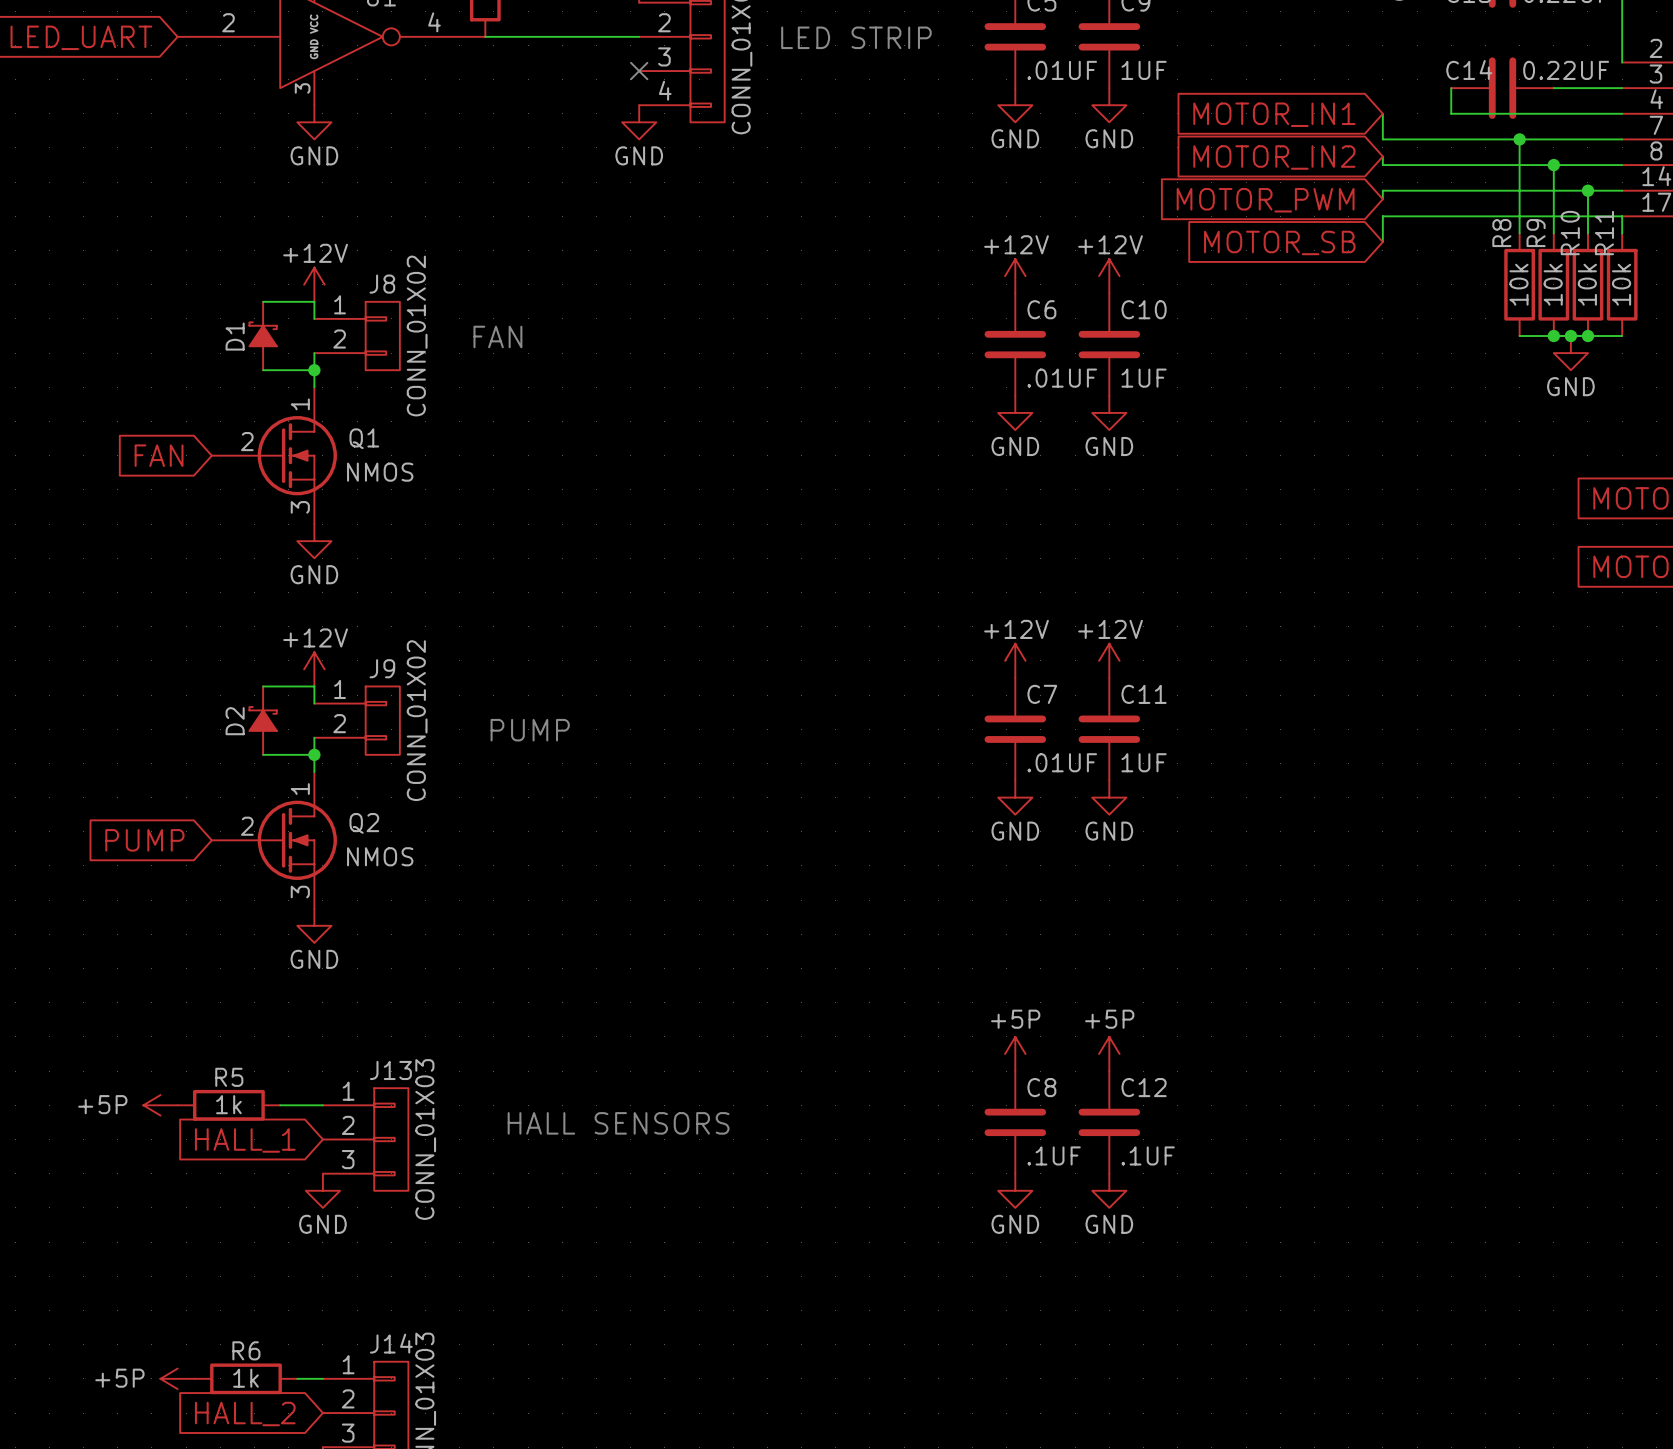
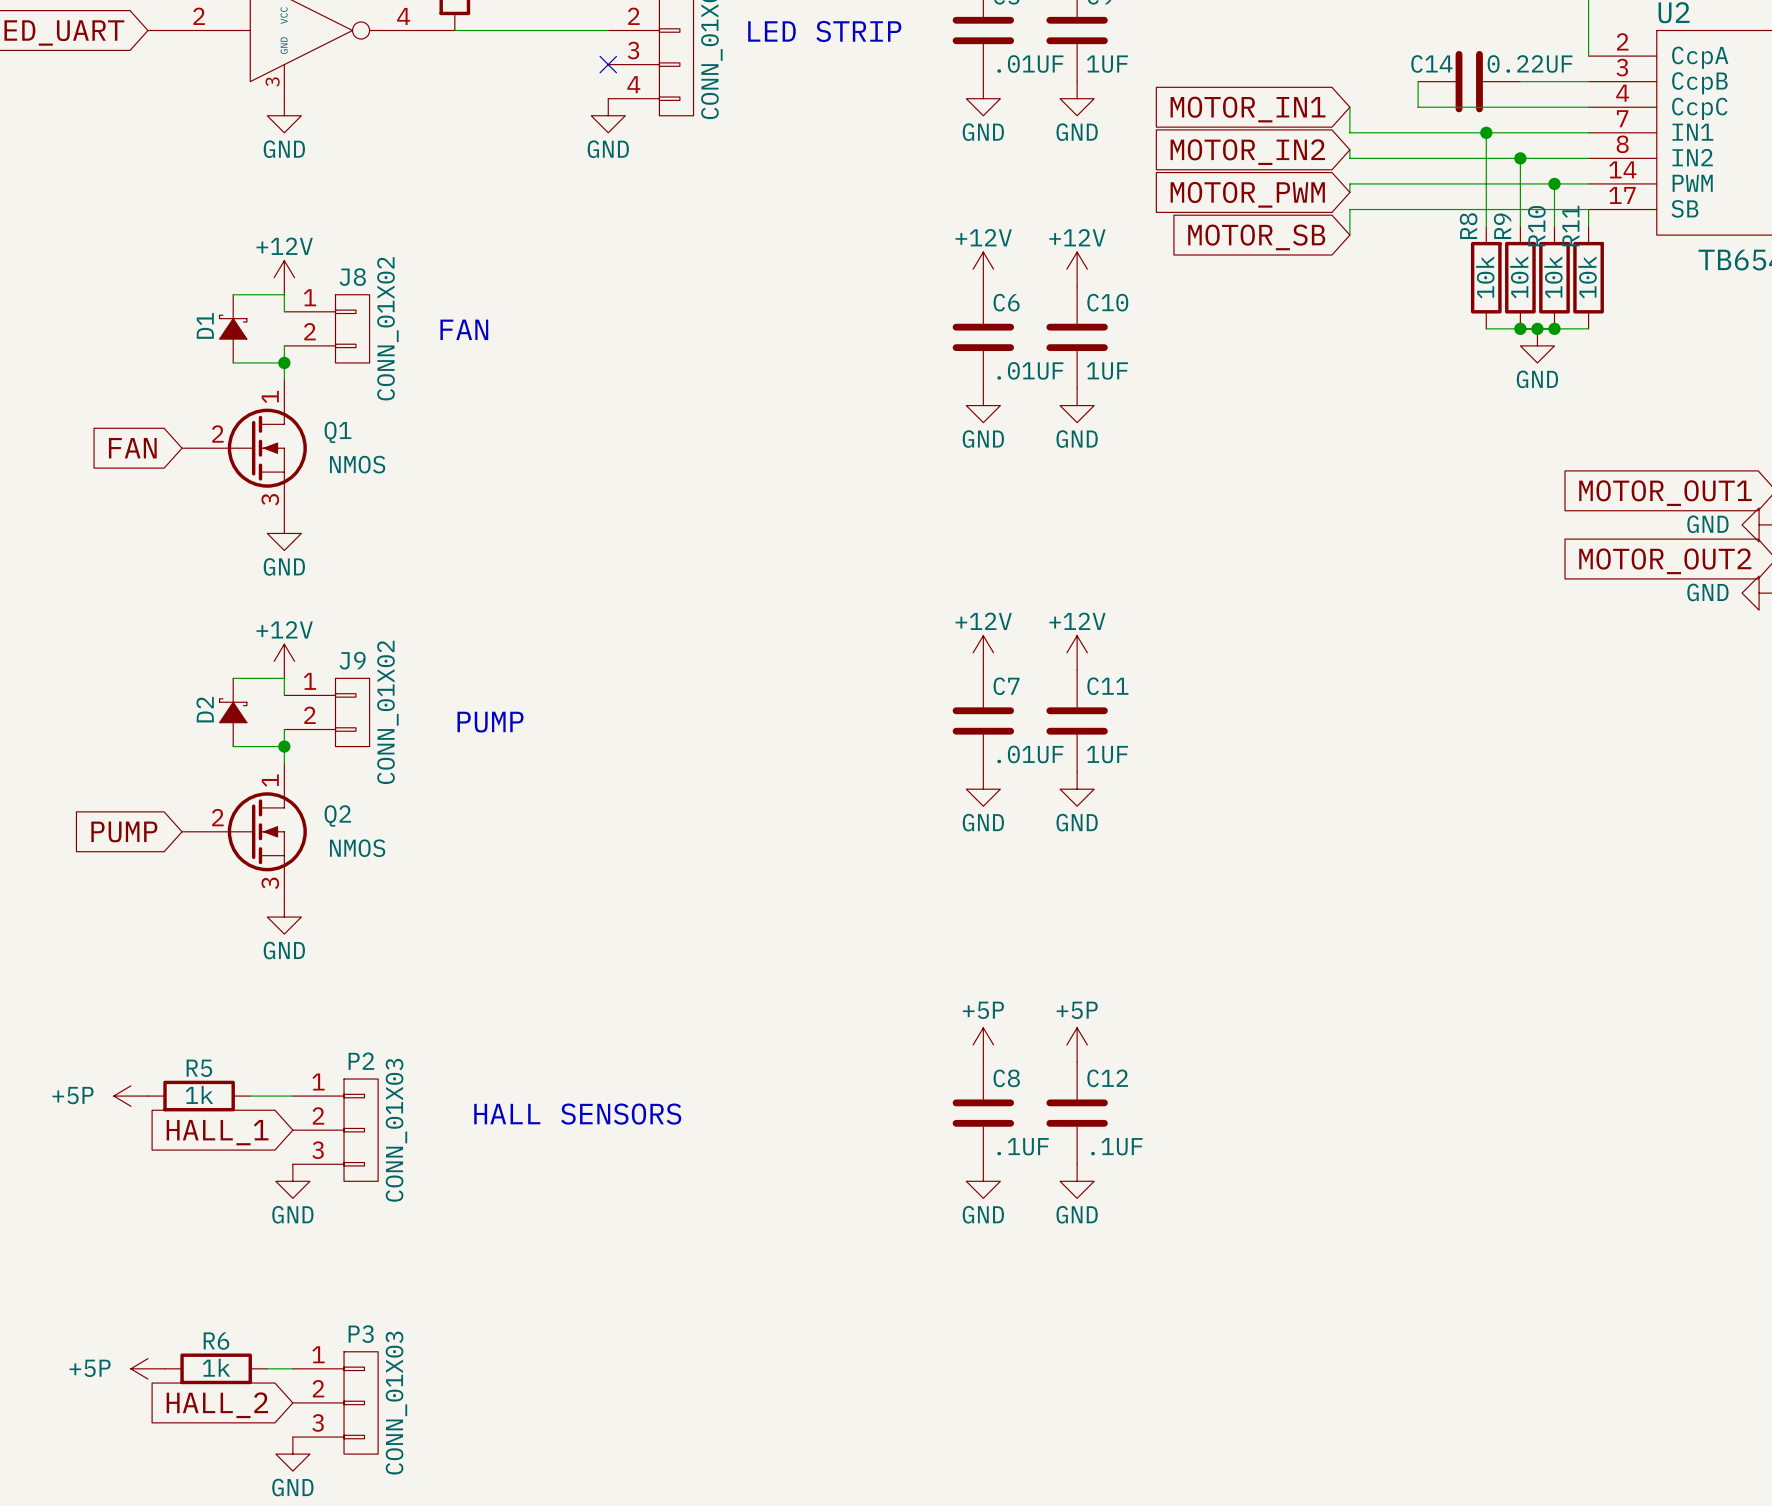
J13 name: J13 (390, 1070) -> P2 (361, 1061)
J14 name: J14 (391, 1343) -> P3 (361, 1334)

